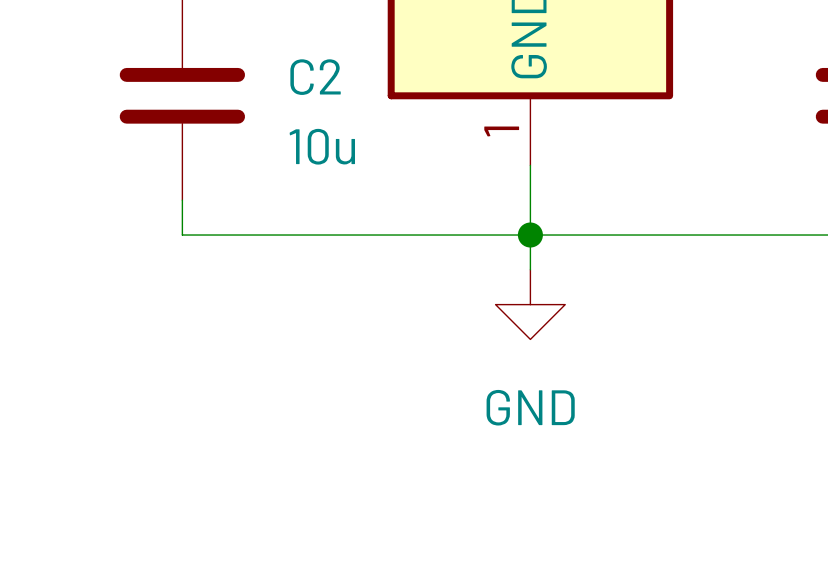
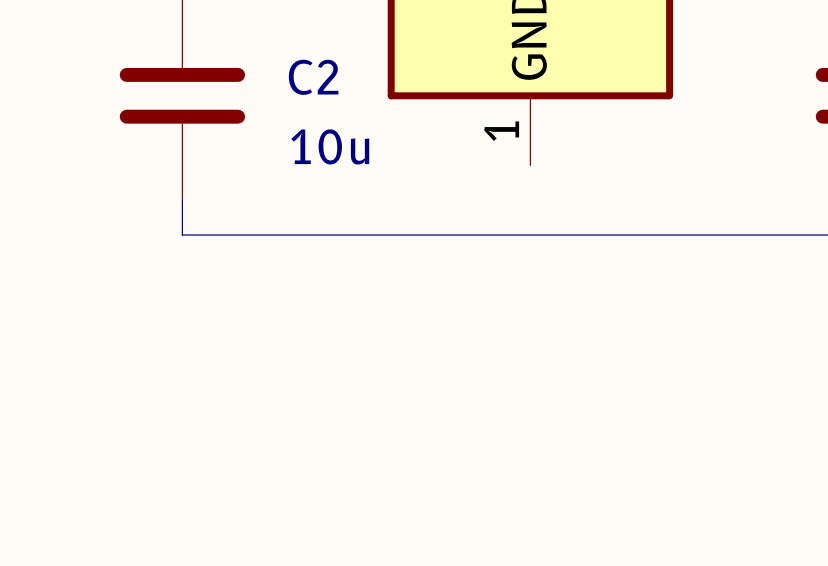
wire: (530, 165) (530, 269) -> none
junction: (530, 235) -> none
power symbol: GND (530, 304) -> none

